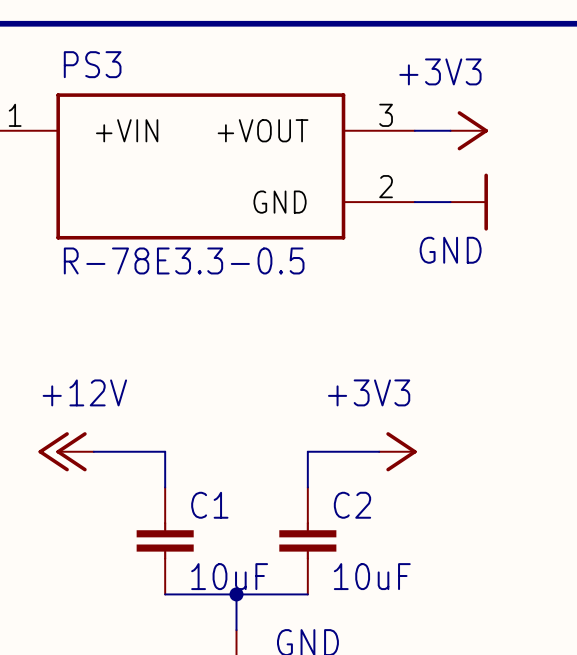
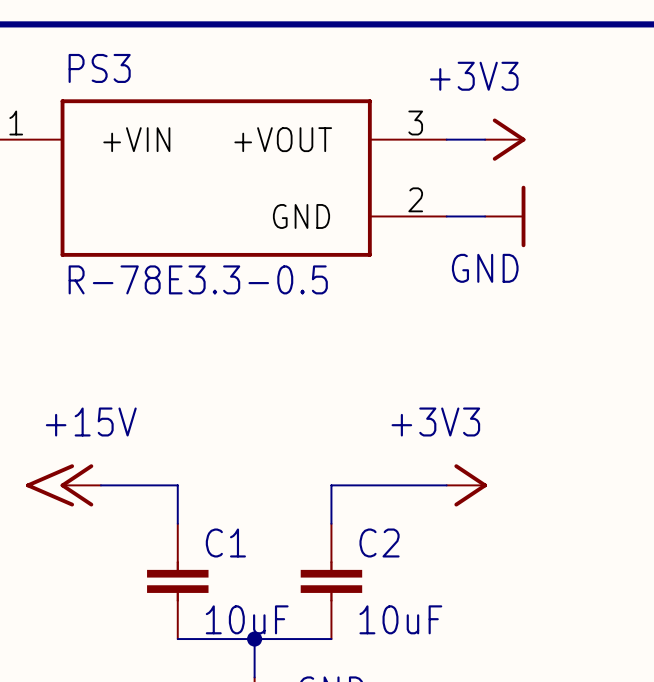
power symbol: +12V (66, 451) -> +15V (63, 485)
power symbol position: +3V3 (397, 451) -> +3V3 (466, 485)

